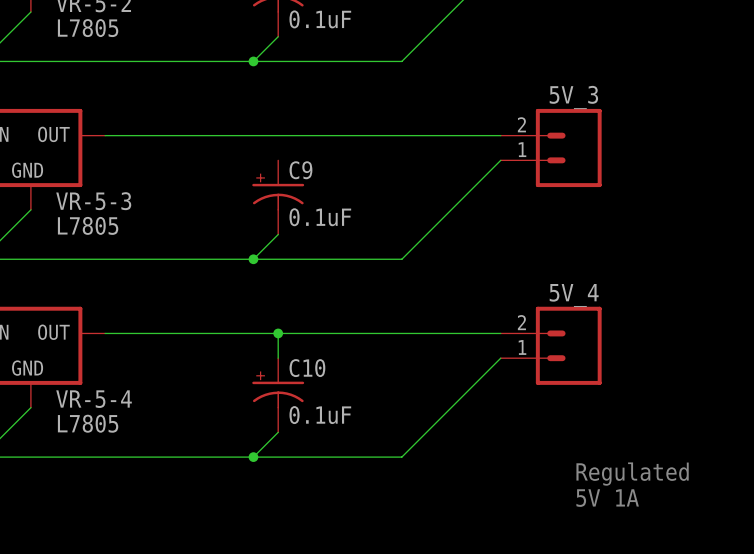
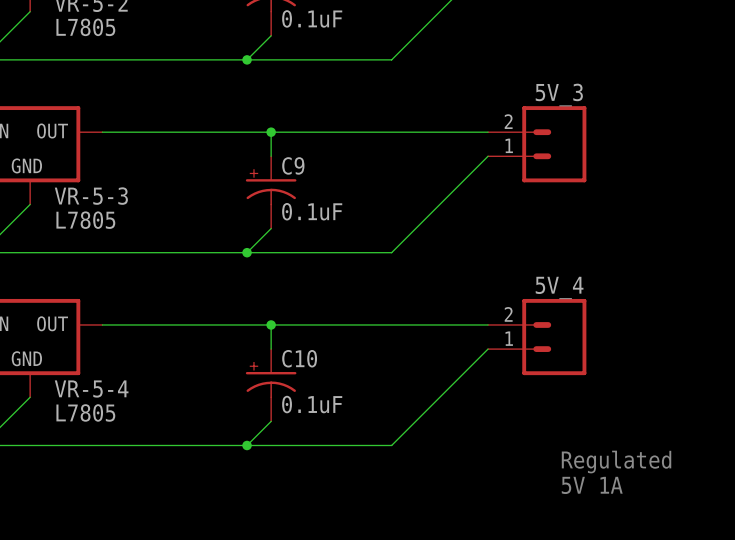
wire: none -> (271, 132) (271, 156)
junction: none -> (271, 132)

